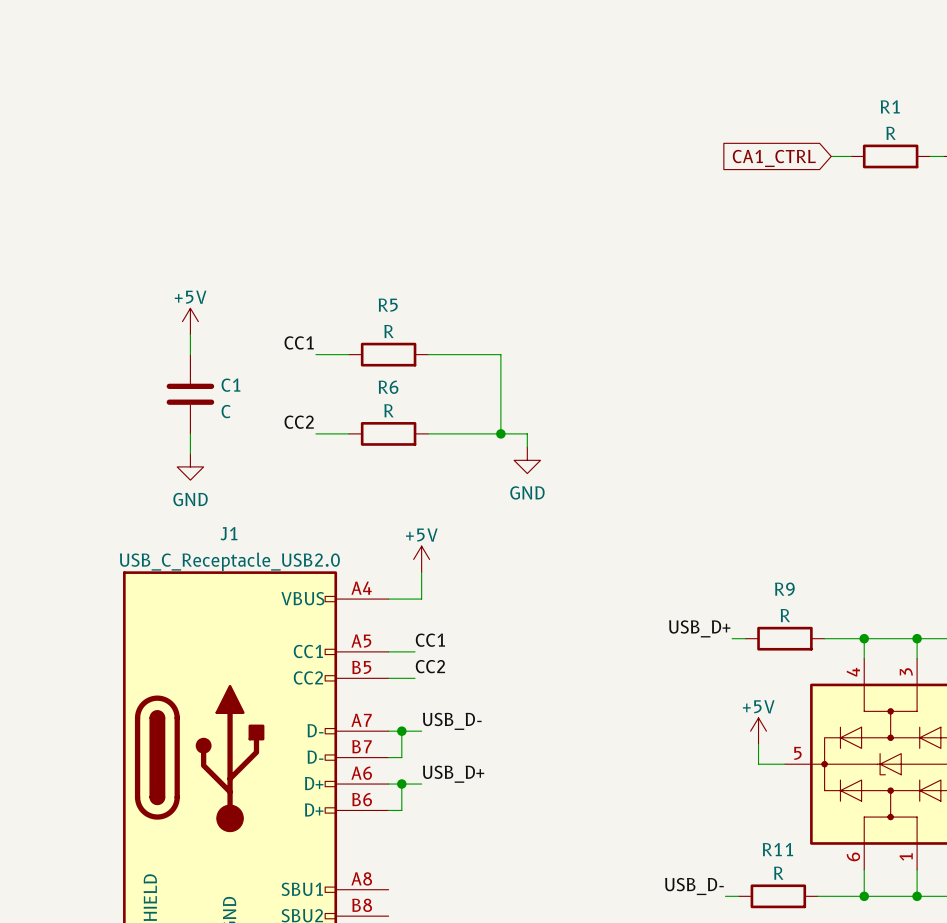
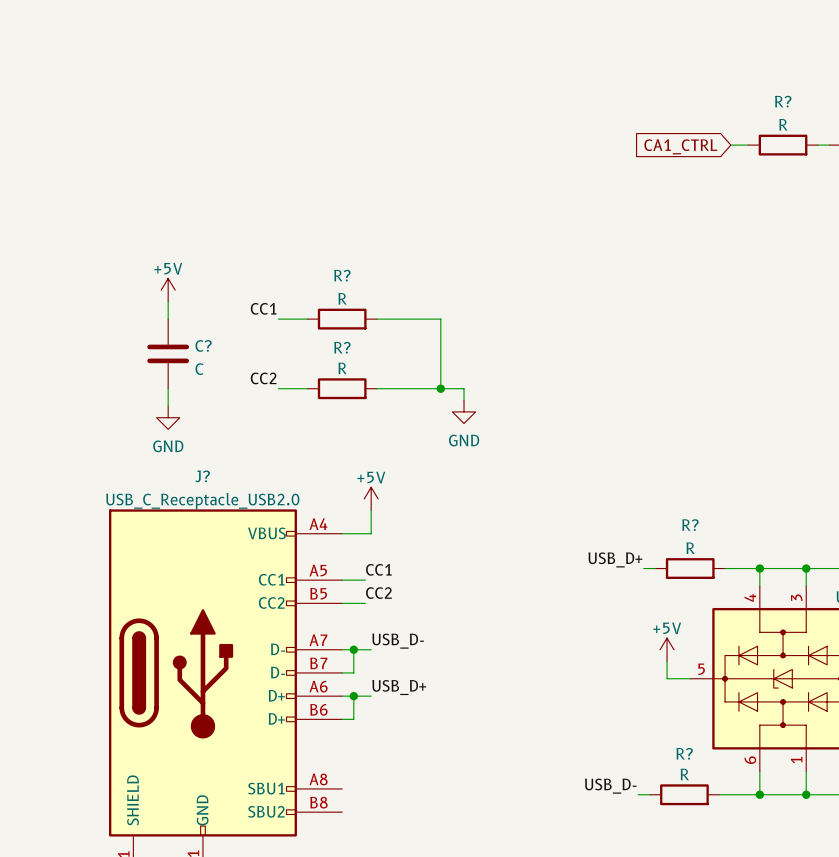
R1 name: R1 (890, 106) -> R? (783, 101)
R5 name: R5 (388, 305) -> R? (342, 275)
C1 name: C1 (230, 385) -> C? (203, 345)
R6 name: R6 (388, 387) -> R? (342, 347)
J1 name: J1 (228, 533) -> J? (202, 476)
R9 name: R9 (784, 589) -> R? (690, 525)
R11 name: R11 (777, 849) -> R? (684, 753)

